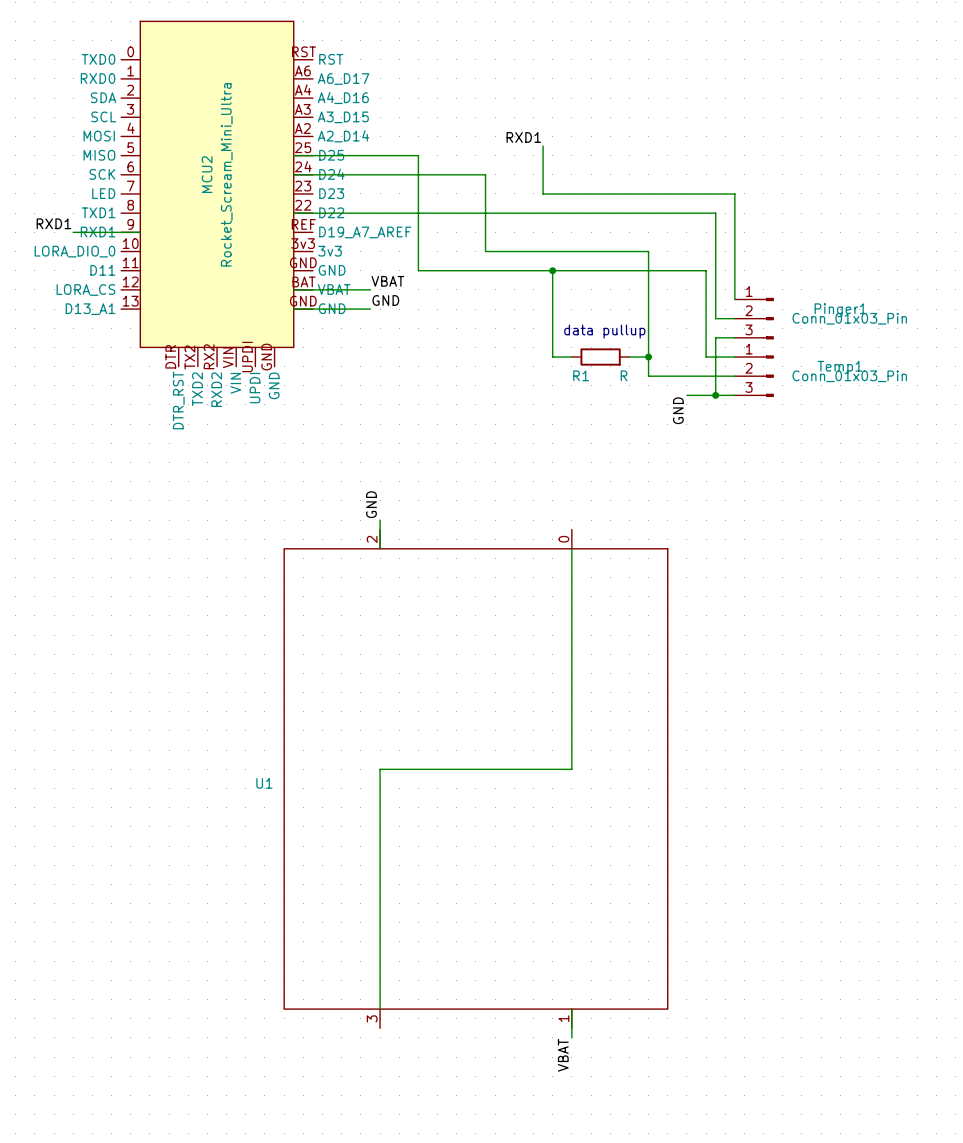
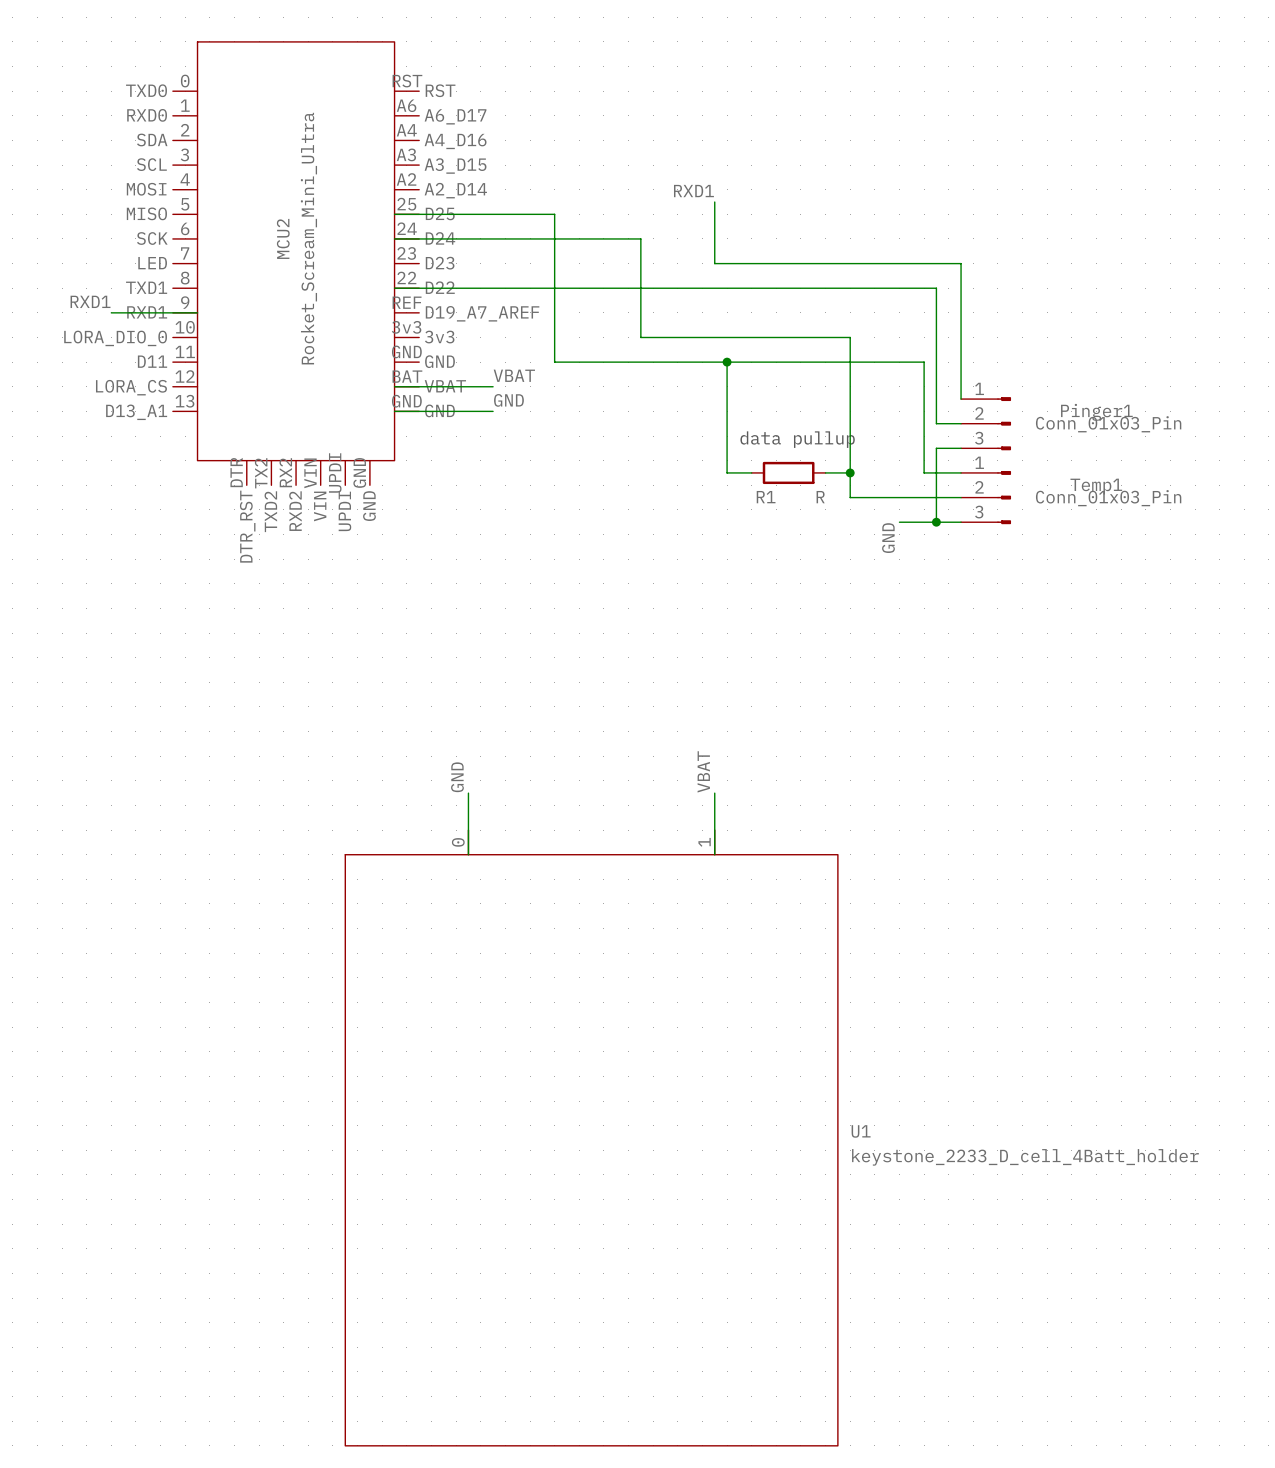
label position: GND (371, 504) -> GND (457, 777)
wire: (380, 520) (380, 548) -> none
U1 symbol: [284, 529, 668, 1029] -> [345, 830, 838, 1446]
wire: (571, 548) (571, 769) (380, 769) (380, 1009) -> none
label: none -> VBAT (703, 771)
wire: none -> (468, 793) (468, 854)
wire: none -> (714, 793) (714, 854)
U1 name position: U1 (264, 783) -> U1 (861, 1131)
U1 value: none -> keystone_2233_D_cell_4Batt_holder (1025, 1157)
wire: (571, 1009) (571, 1037) -> none
label: VBAT (563, 1055) -> none

